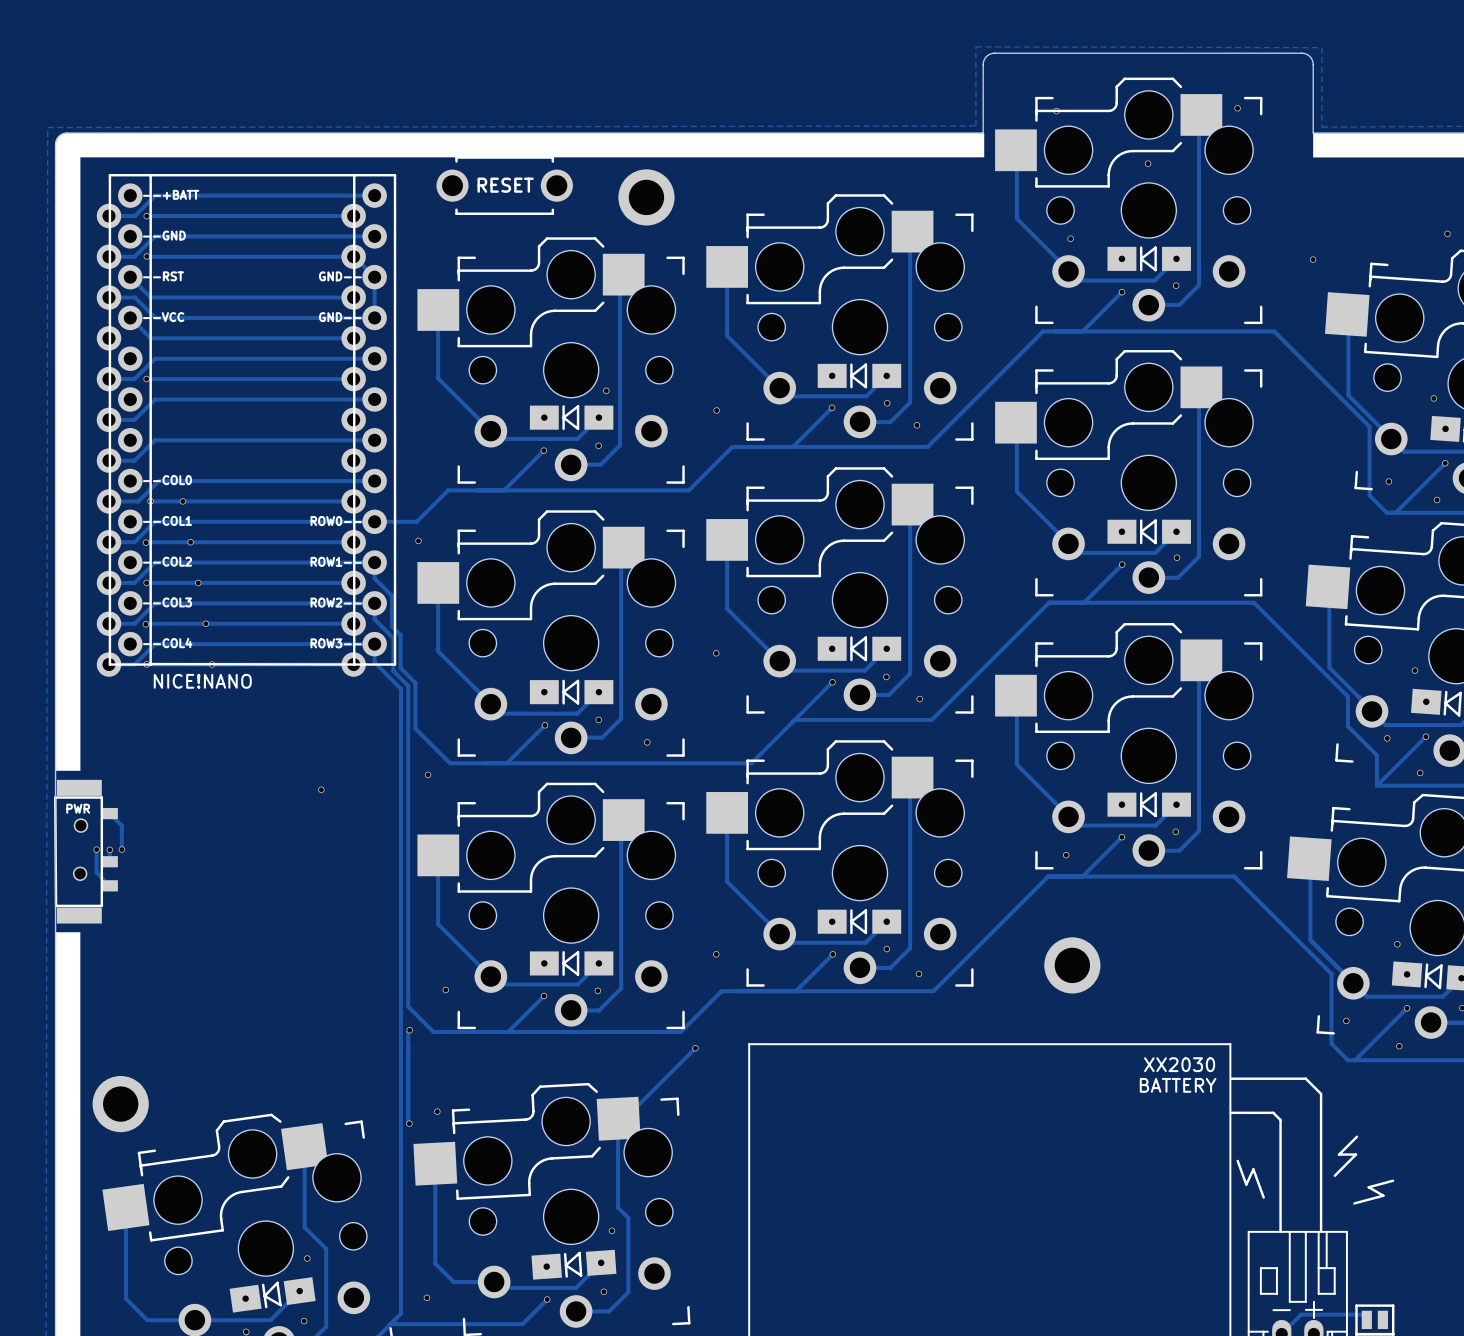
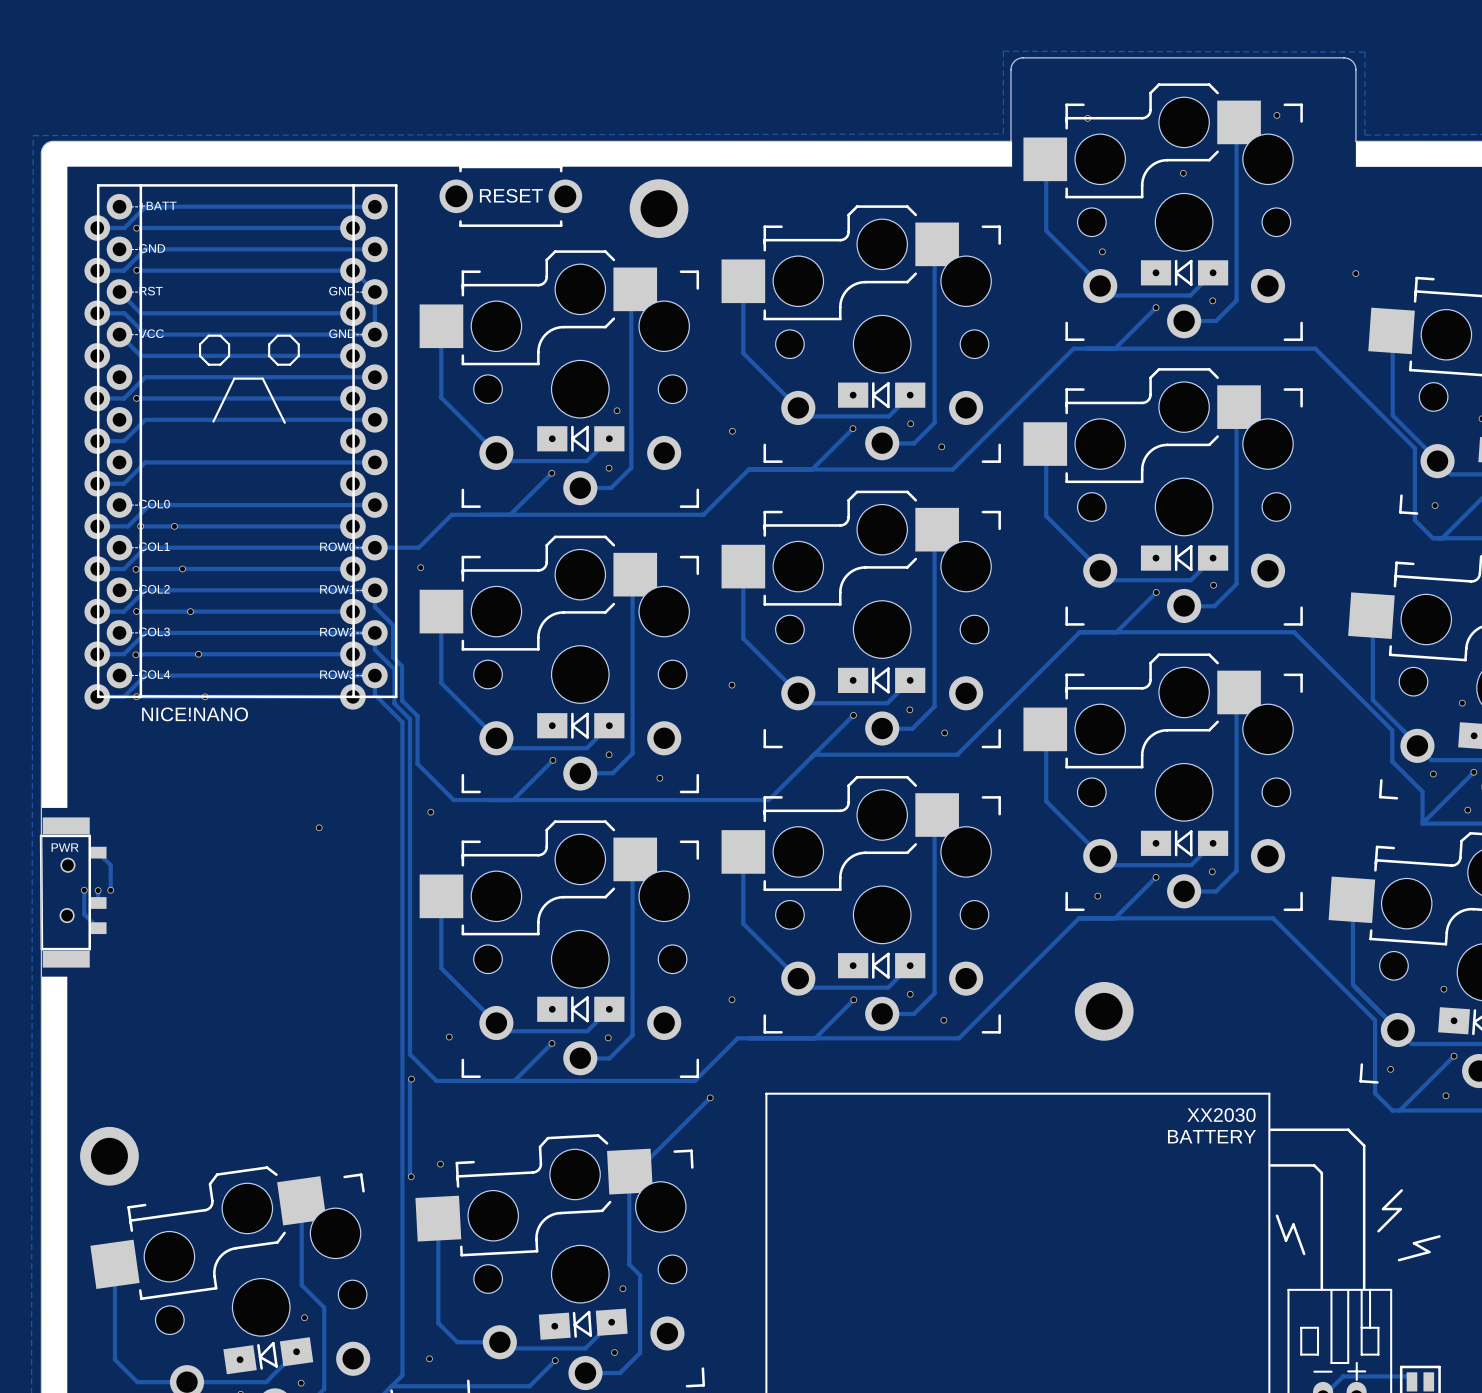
line: none -> (208, 335) (200, 344) (200, 355) (208, 364) (220, 364) (229, 355) (229, 344) (220, 335) (208, 335)
line: none -> (277, 335) (290, 335) (298, 344) (298, 355) (290, 364) (277, 364) (269, 355) (269, 344) (277, 335)
line: none -> (213, 421) (234, 378) (262, 378) (284, 422)

